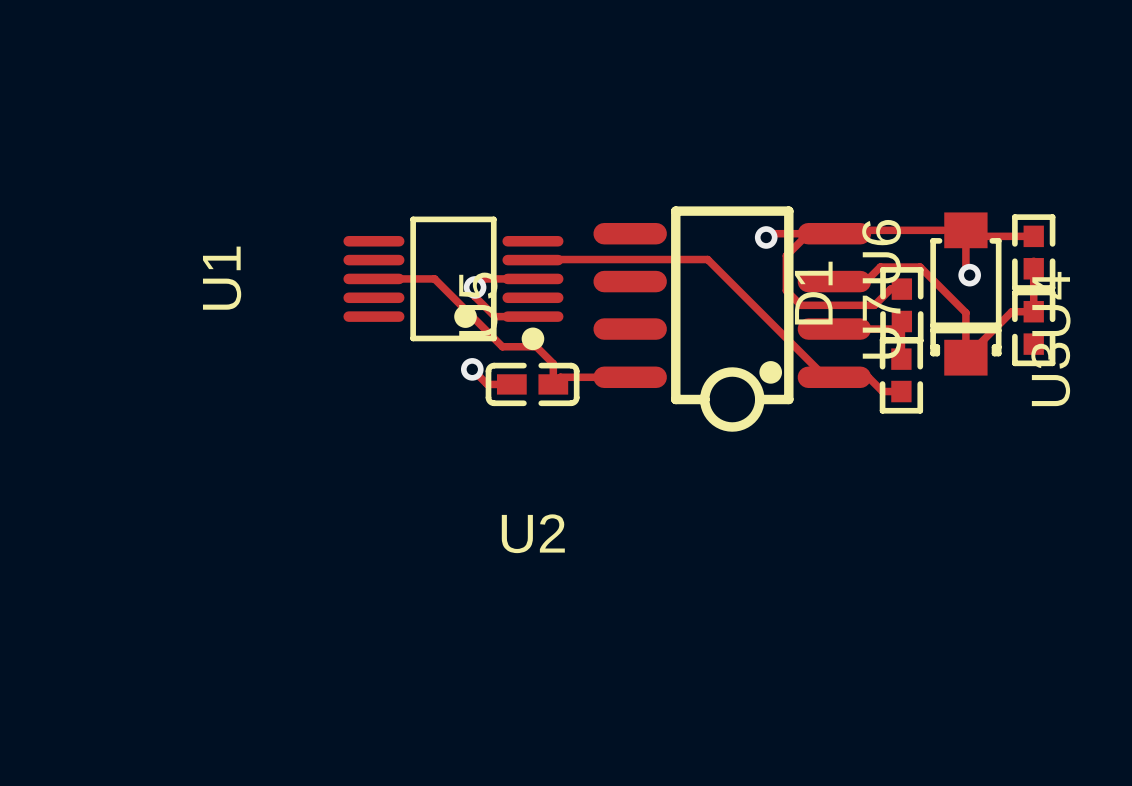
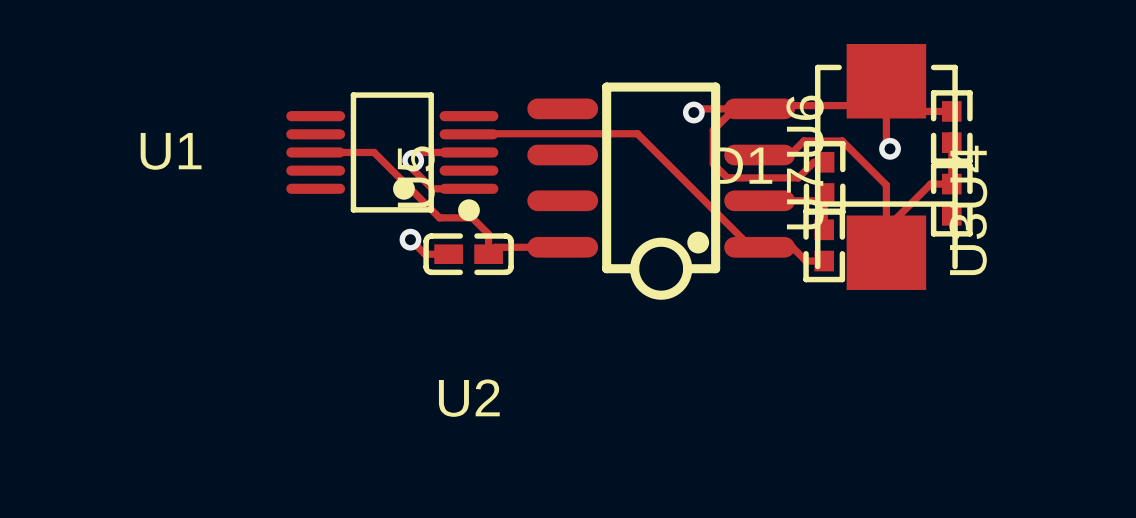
D1 footprint: [930, 212, 1002, 376] -> [815, 44, 958, 290]
U1 name rotation: 0° (222, 278) -> 90° clockwise (171, 151)

